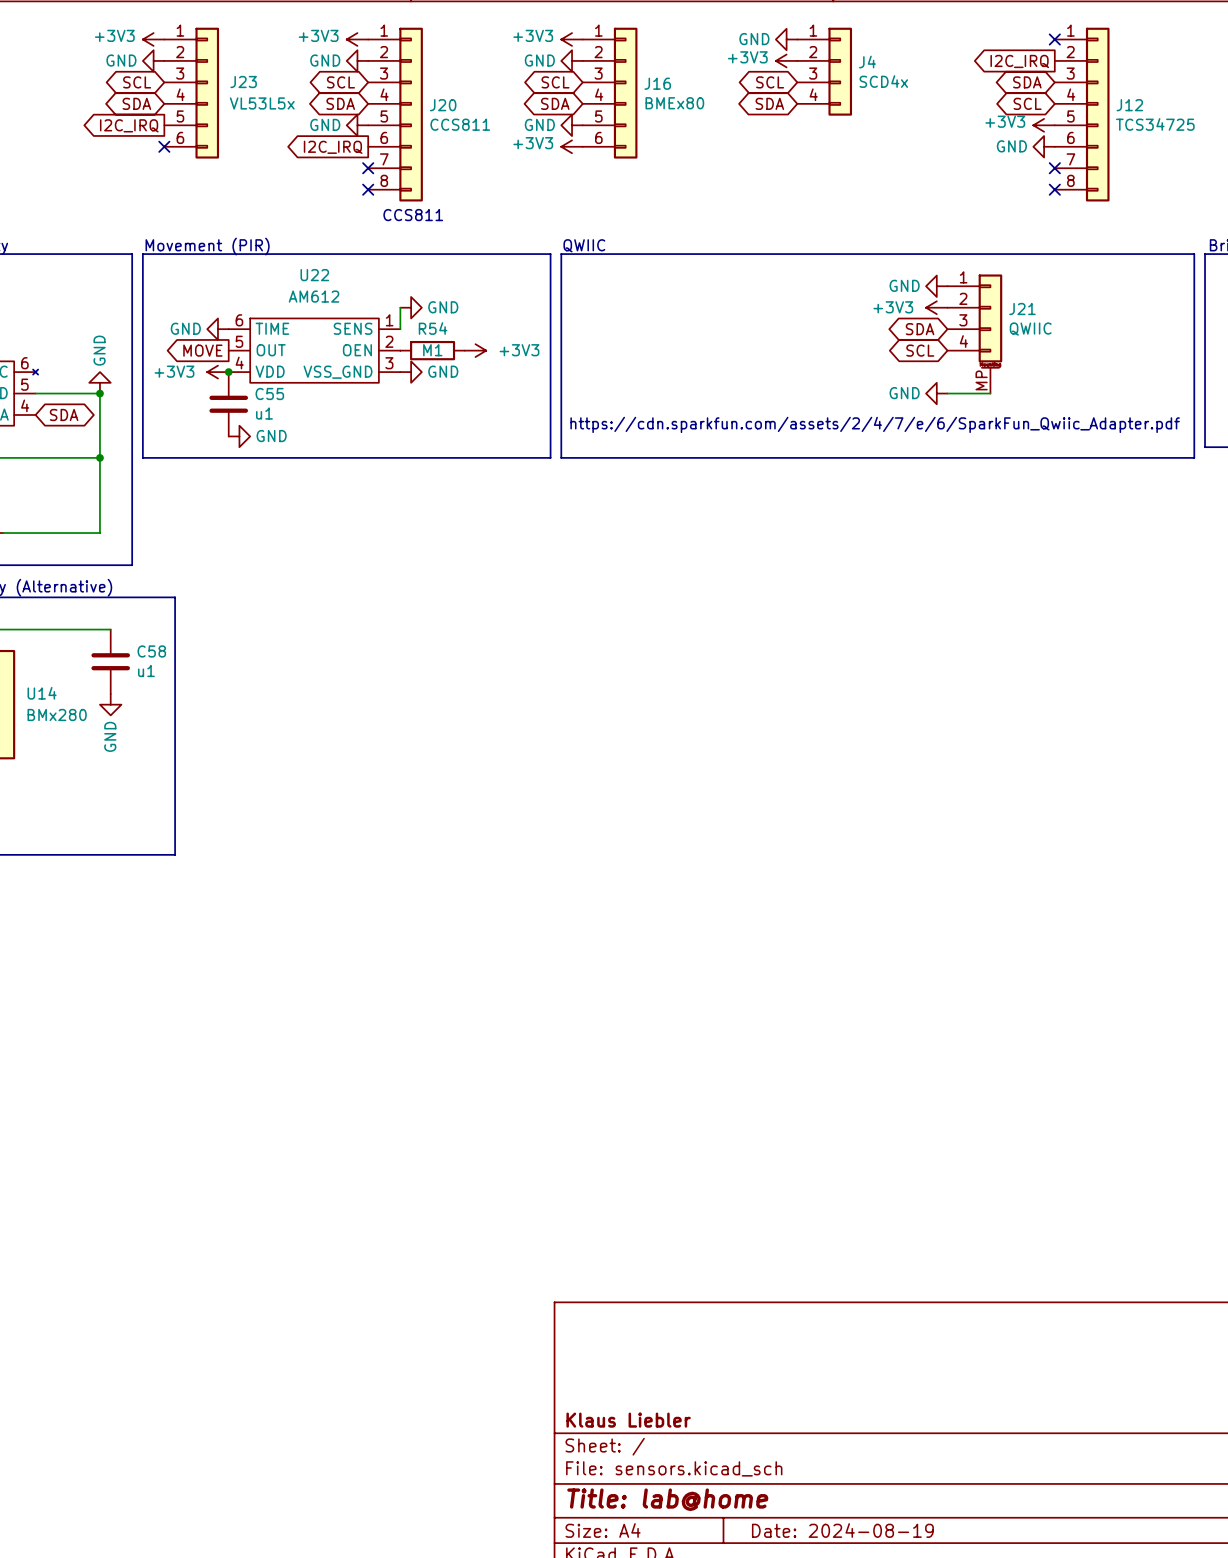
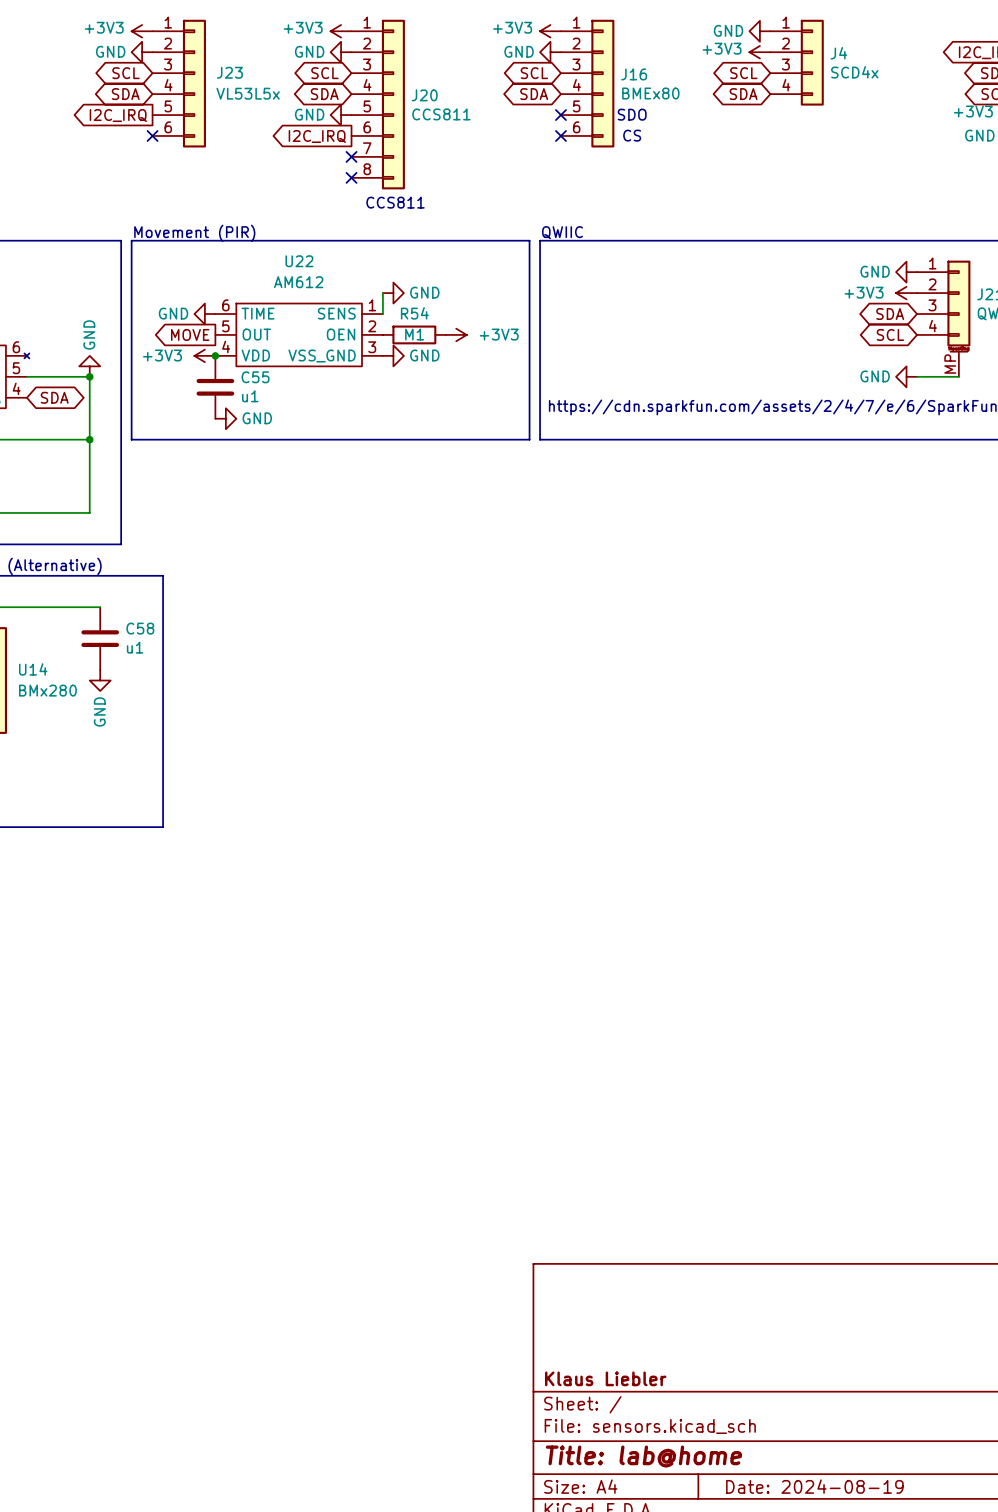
text: none -> SDO (632, 114)
power symbol: GND (572, 125) -> none
no-connect mark: none -> (560, 115)
power symbol: +3V3 (572, 146) -> none
no-connect mark: none -> (560, 135)
text: none -> CS (632, 135)

